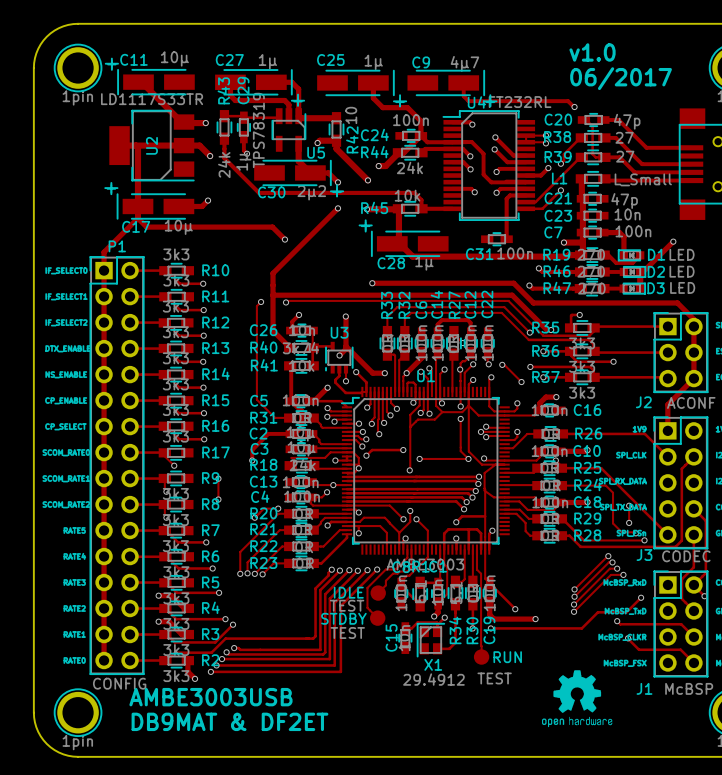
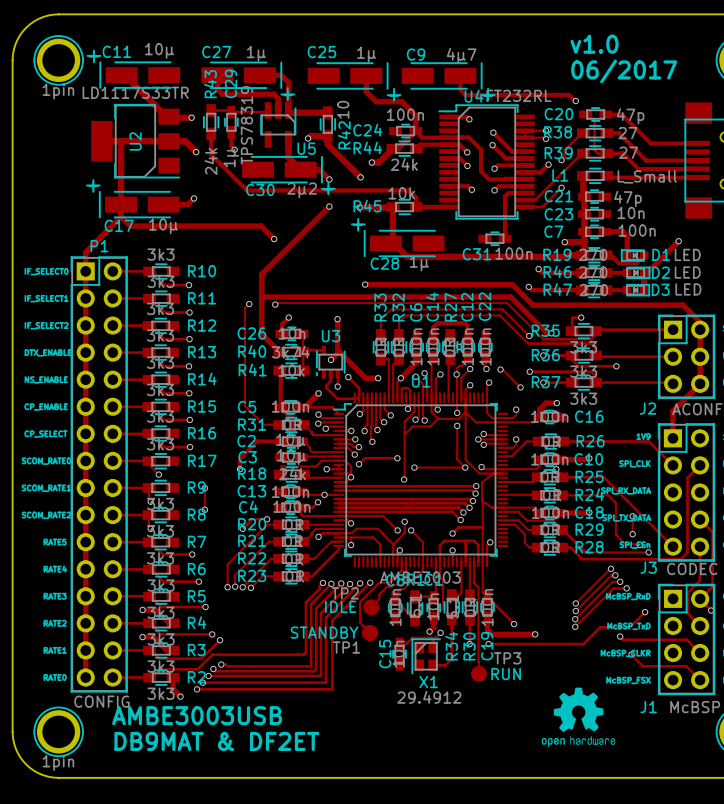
IDLE value: TEST (347, 605) -> TP2 (345, 593)
STANDBY: none -> TP1 (370, 633)
STDBY: TEST (377, 618) -> none
RUN value: TEST (494, 678) -> TP3 (507, 658)

